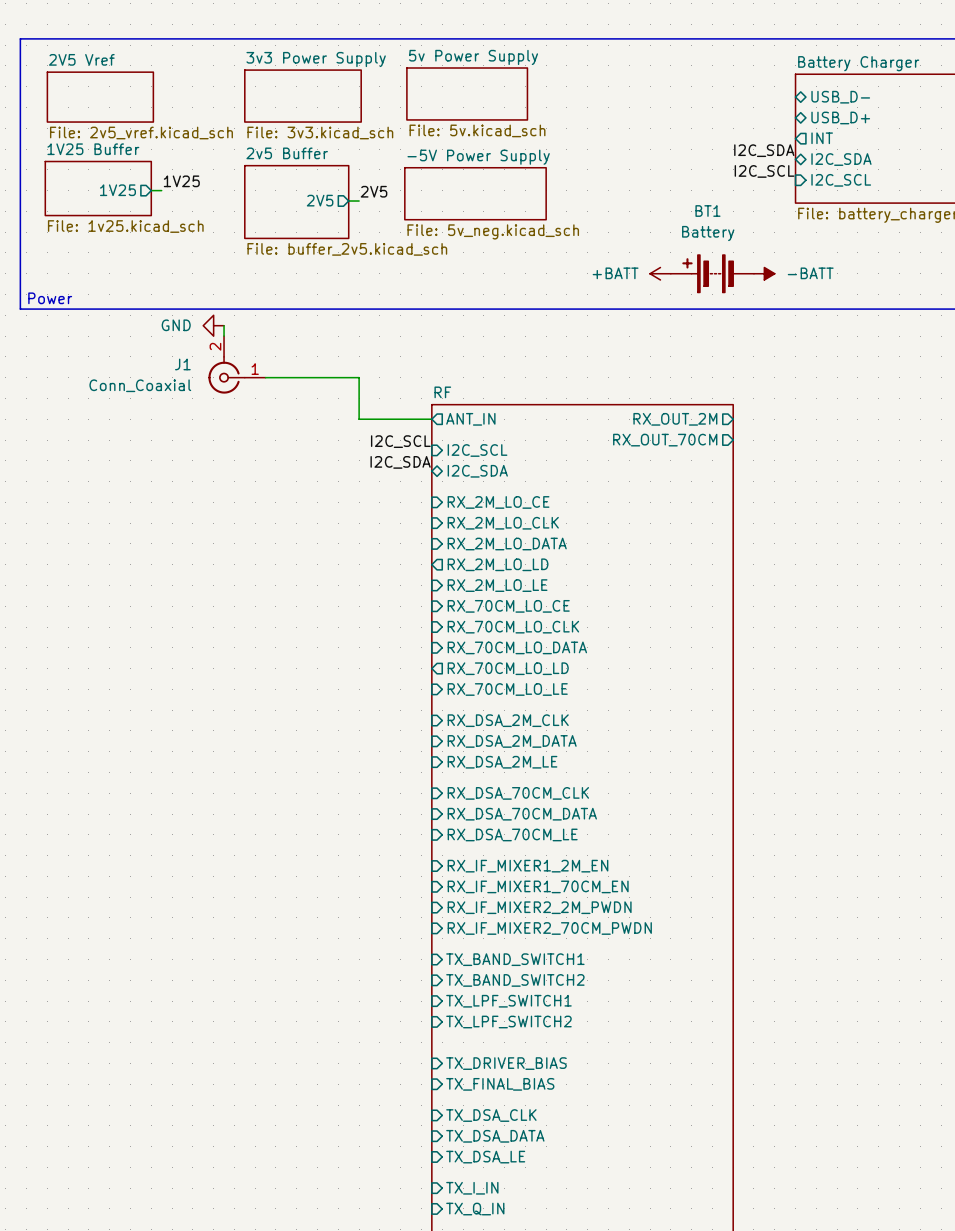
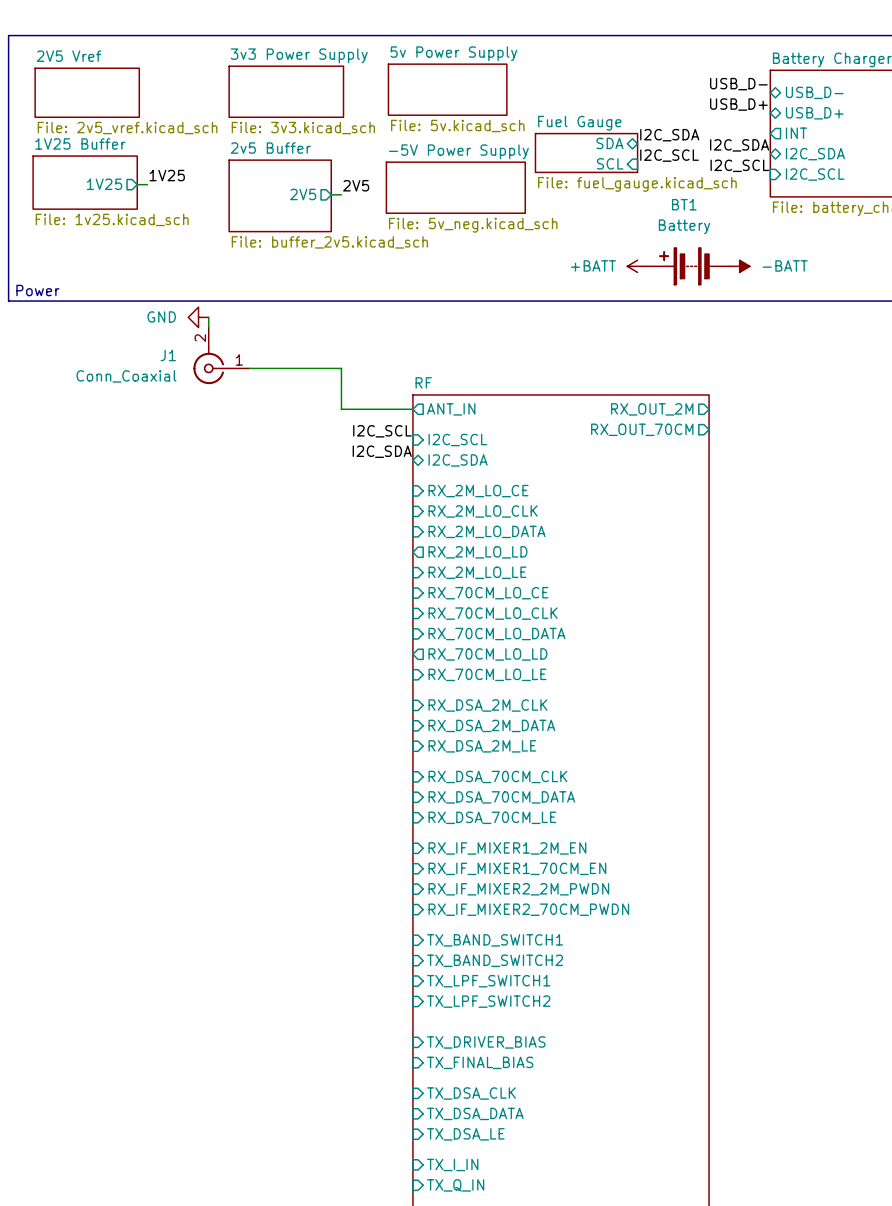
label: none -> USB_D- (738, 84)
label: none -> USB_D+ (738, 104)
label: none -> I2C_SDA (669, 135)
sheet pin: none -> SDA (609, 143)
sheet Fuel Gauge: none -> File: fuel_gauge.kicad_sch (586, 152)
label: none -> I2C_SCL (669, 155)
sheet pin: none -> SCL (610, 163)

